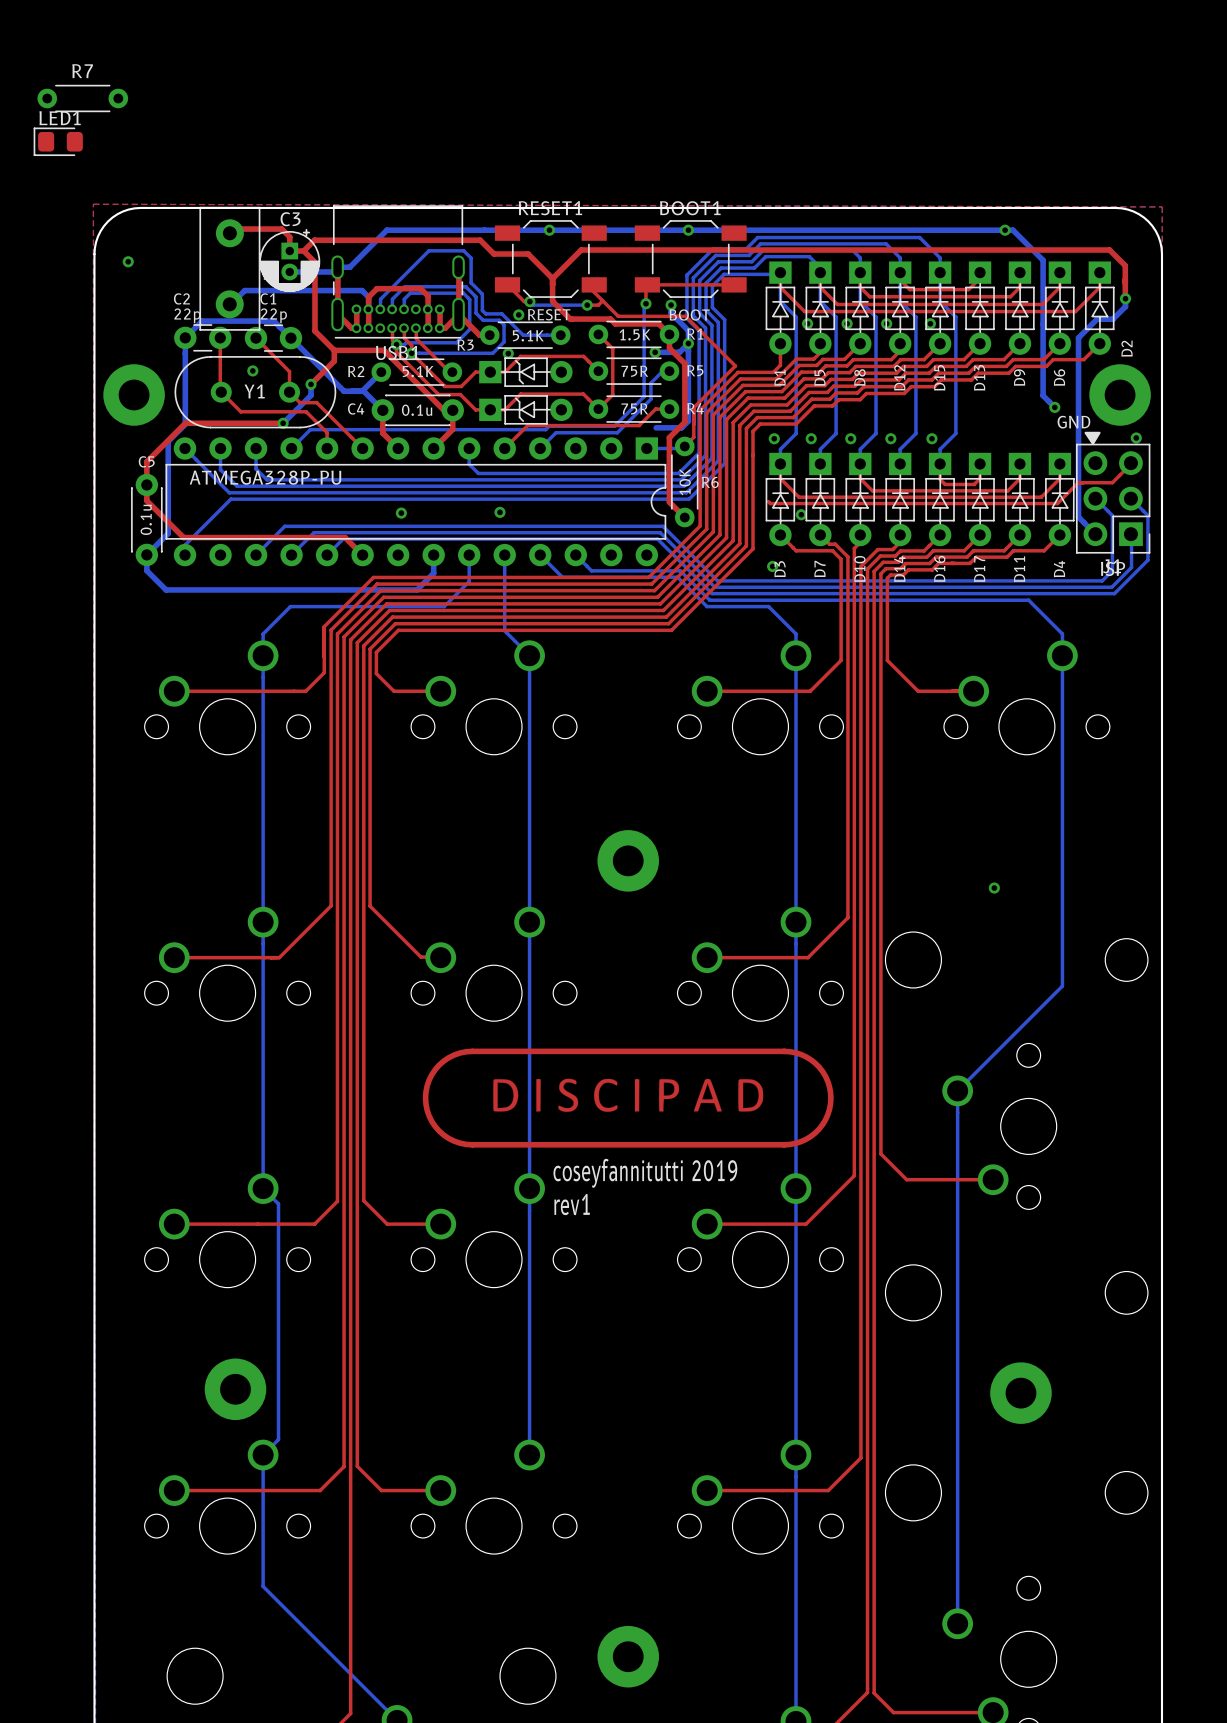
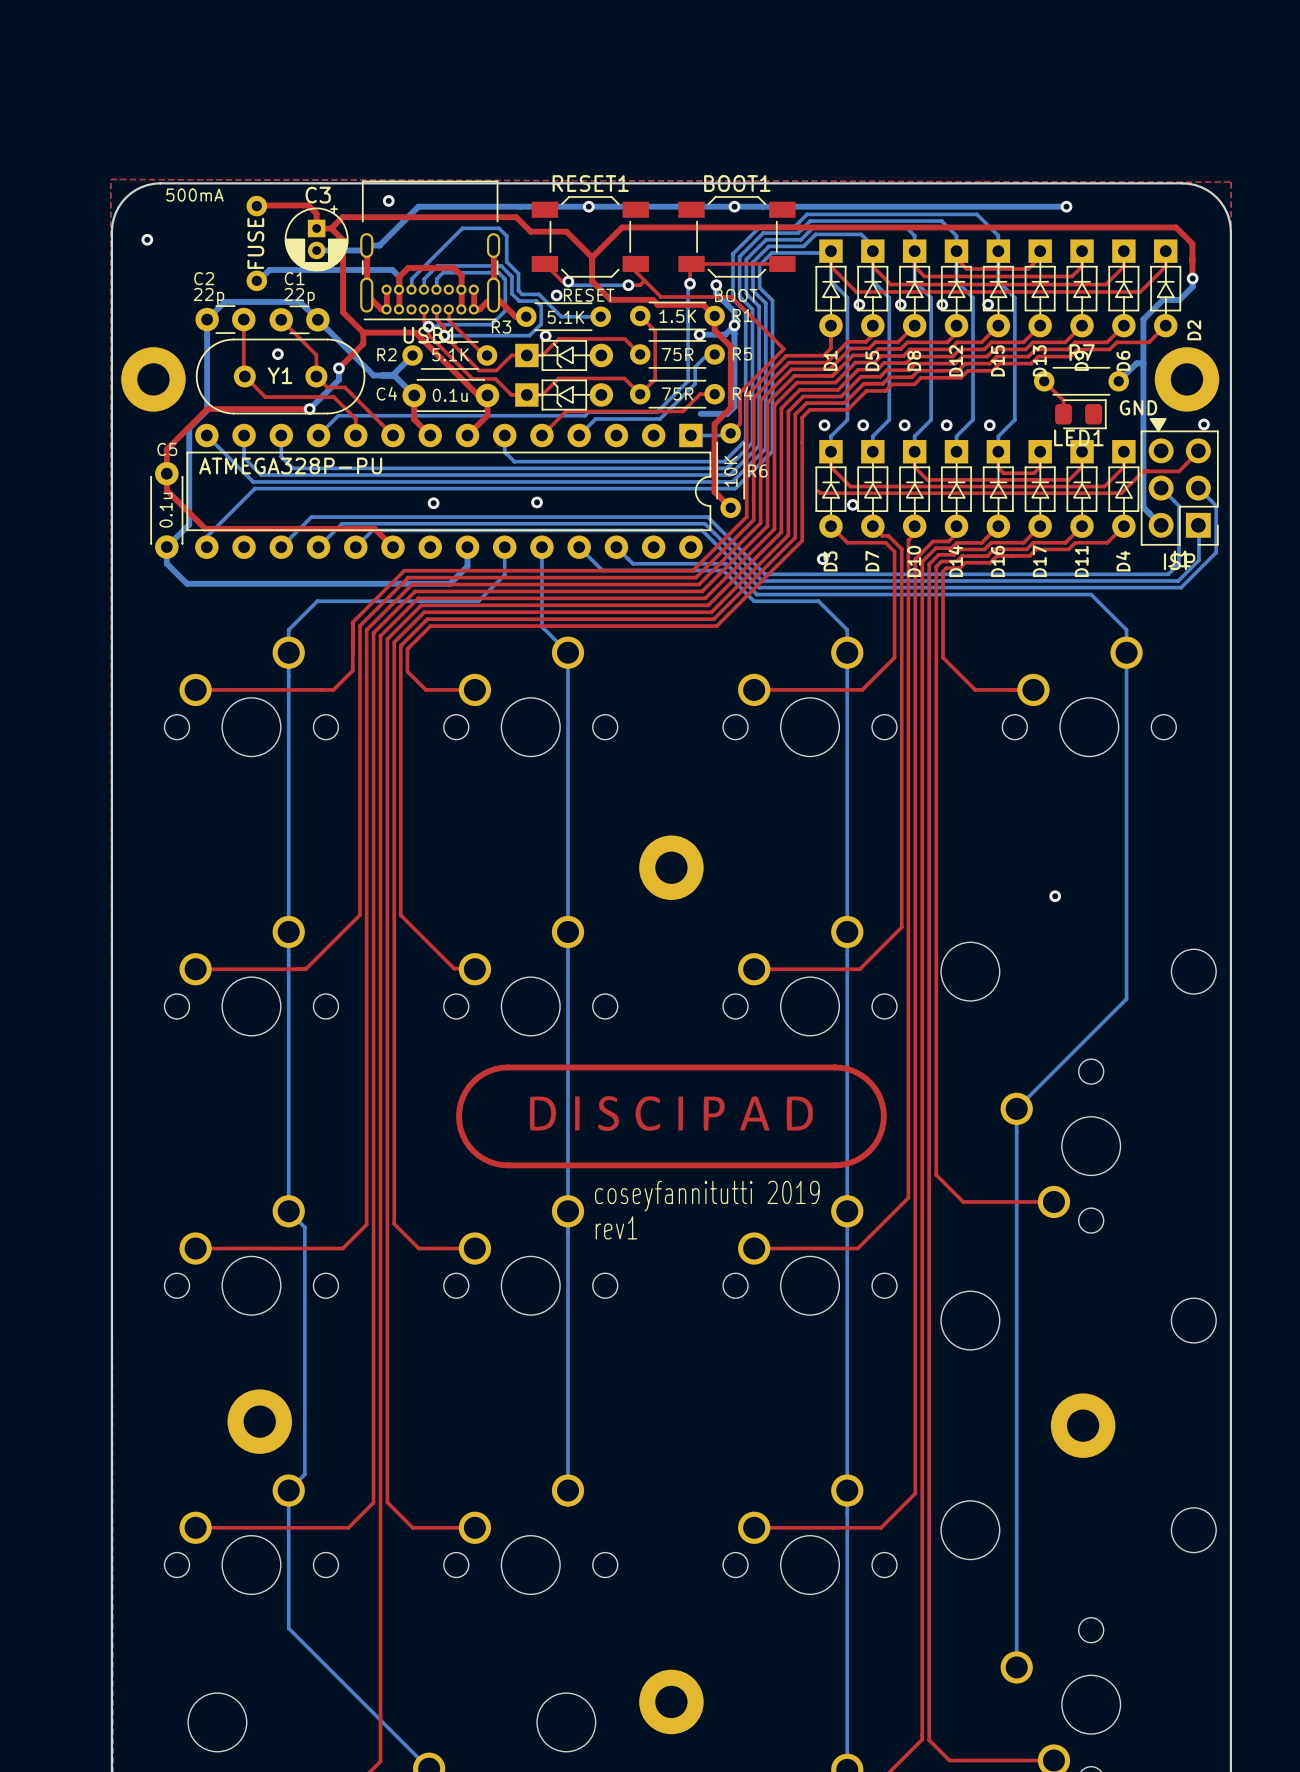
R7 position: (82, 98) -> (1081, 381)
LED1 rotation: 0° (58, 141) -> 180° (1080, 414)
LED1 position: (58, 141) -> (1080, 414)
via: none -> (388, 200)
bottom track: (1005, 230) (1013, 230) (1043, 260) (1043, 395) (1054, 407) -> none
part: none -> 500mA (256, 243)
part: (229, 268) -> none
bottom track: none -> (1143, 363) (1136, 363) (1118, 381)
top track: none -> (1044, 381) (1063, 400) (1063, 414)
via: (1054, 407) -> none

